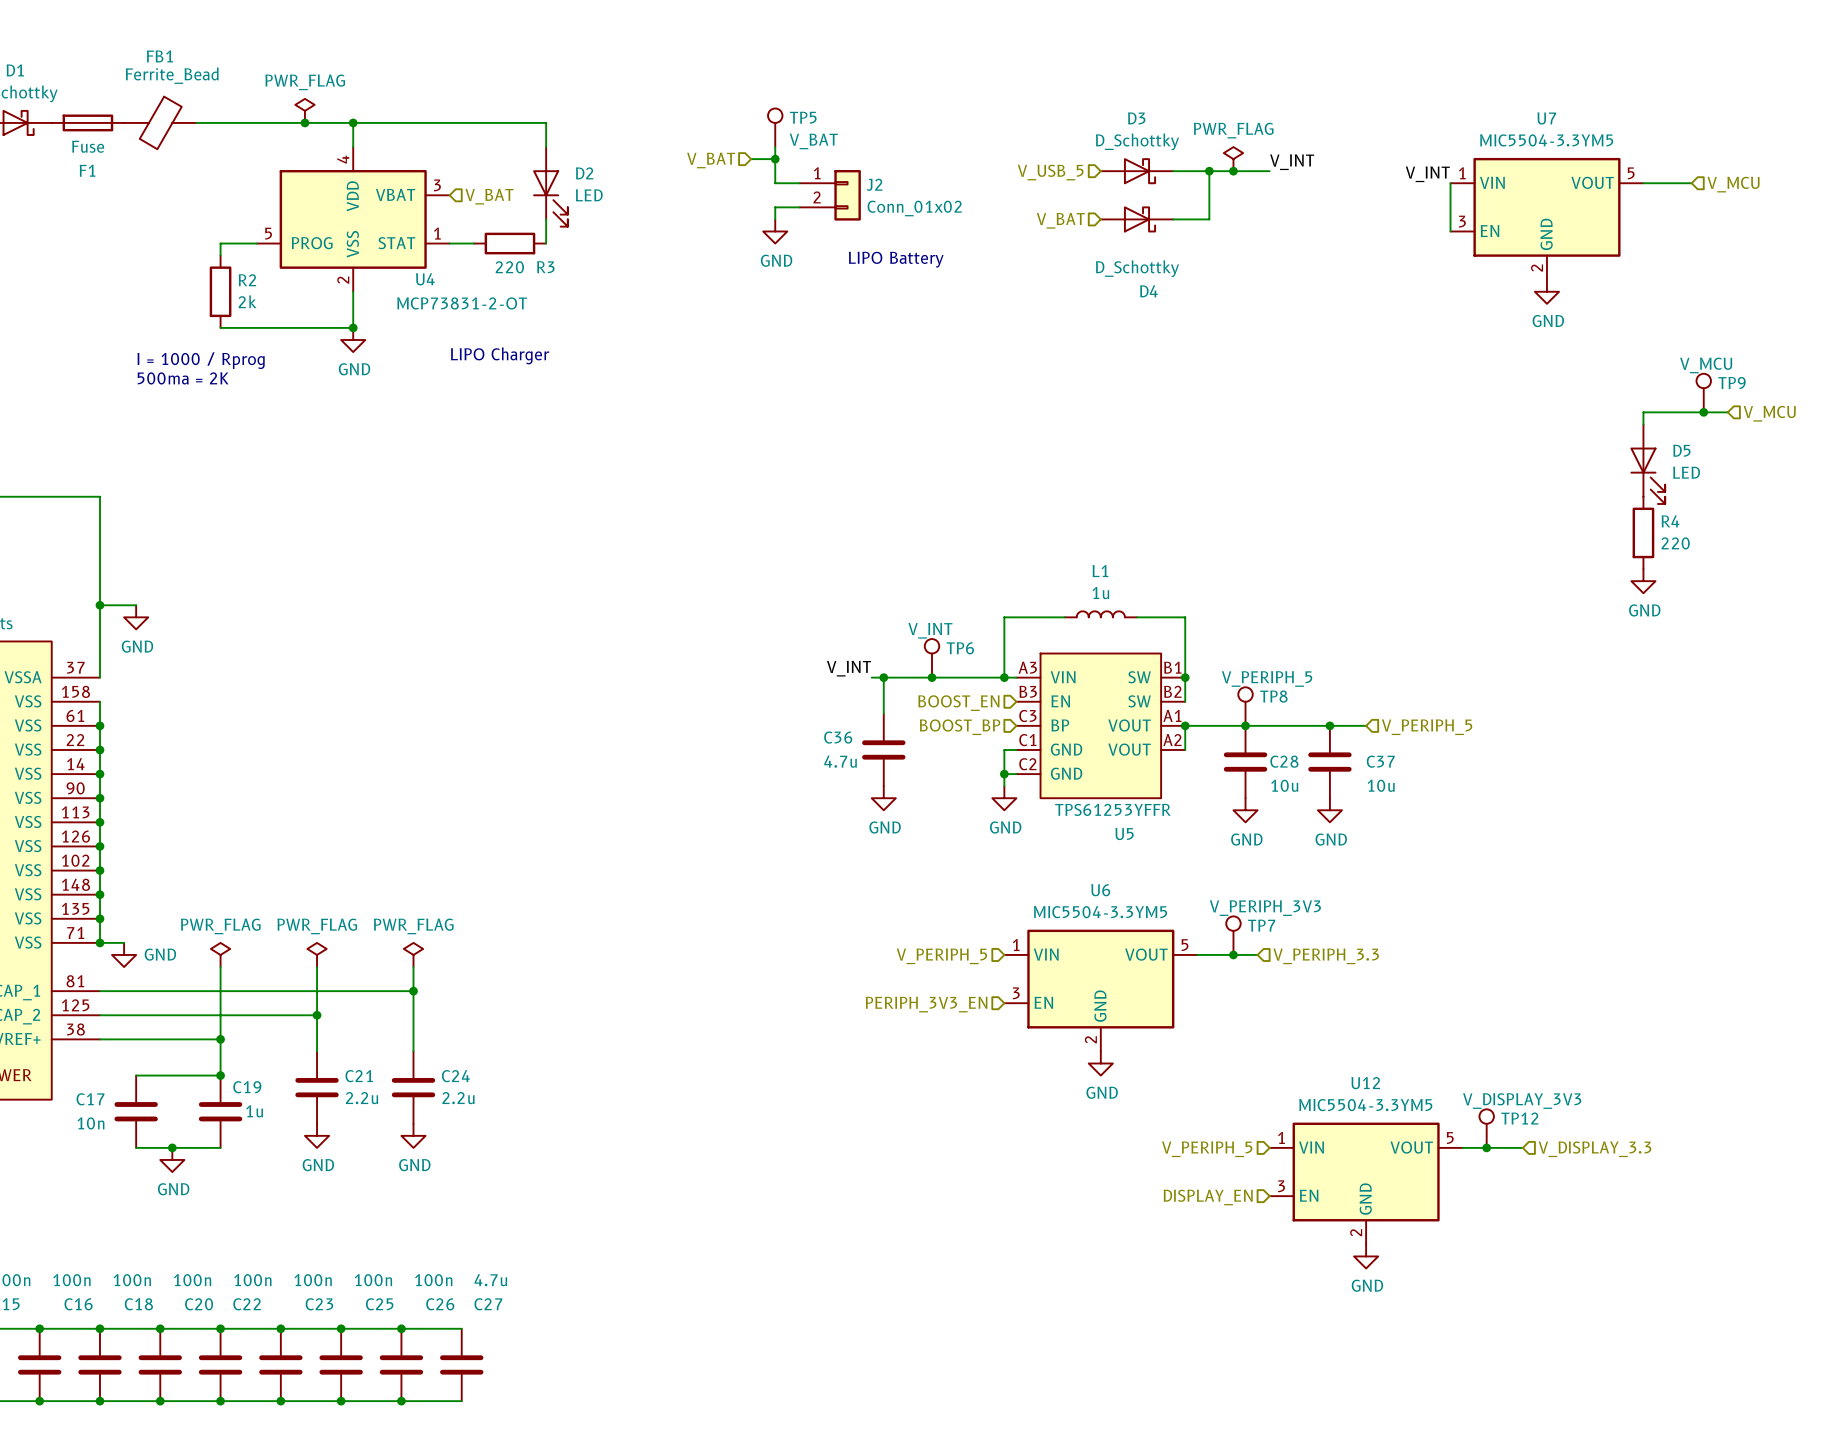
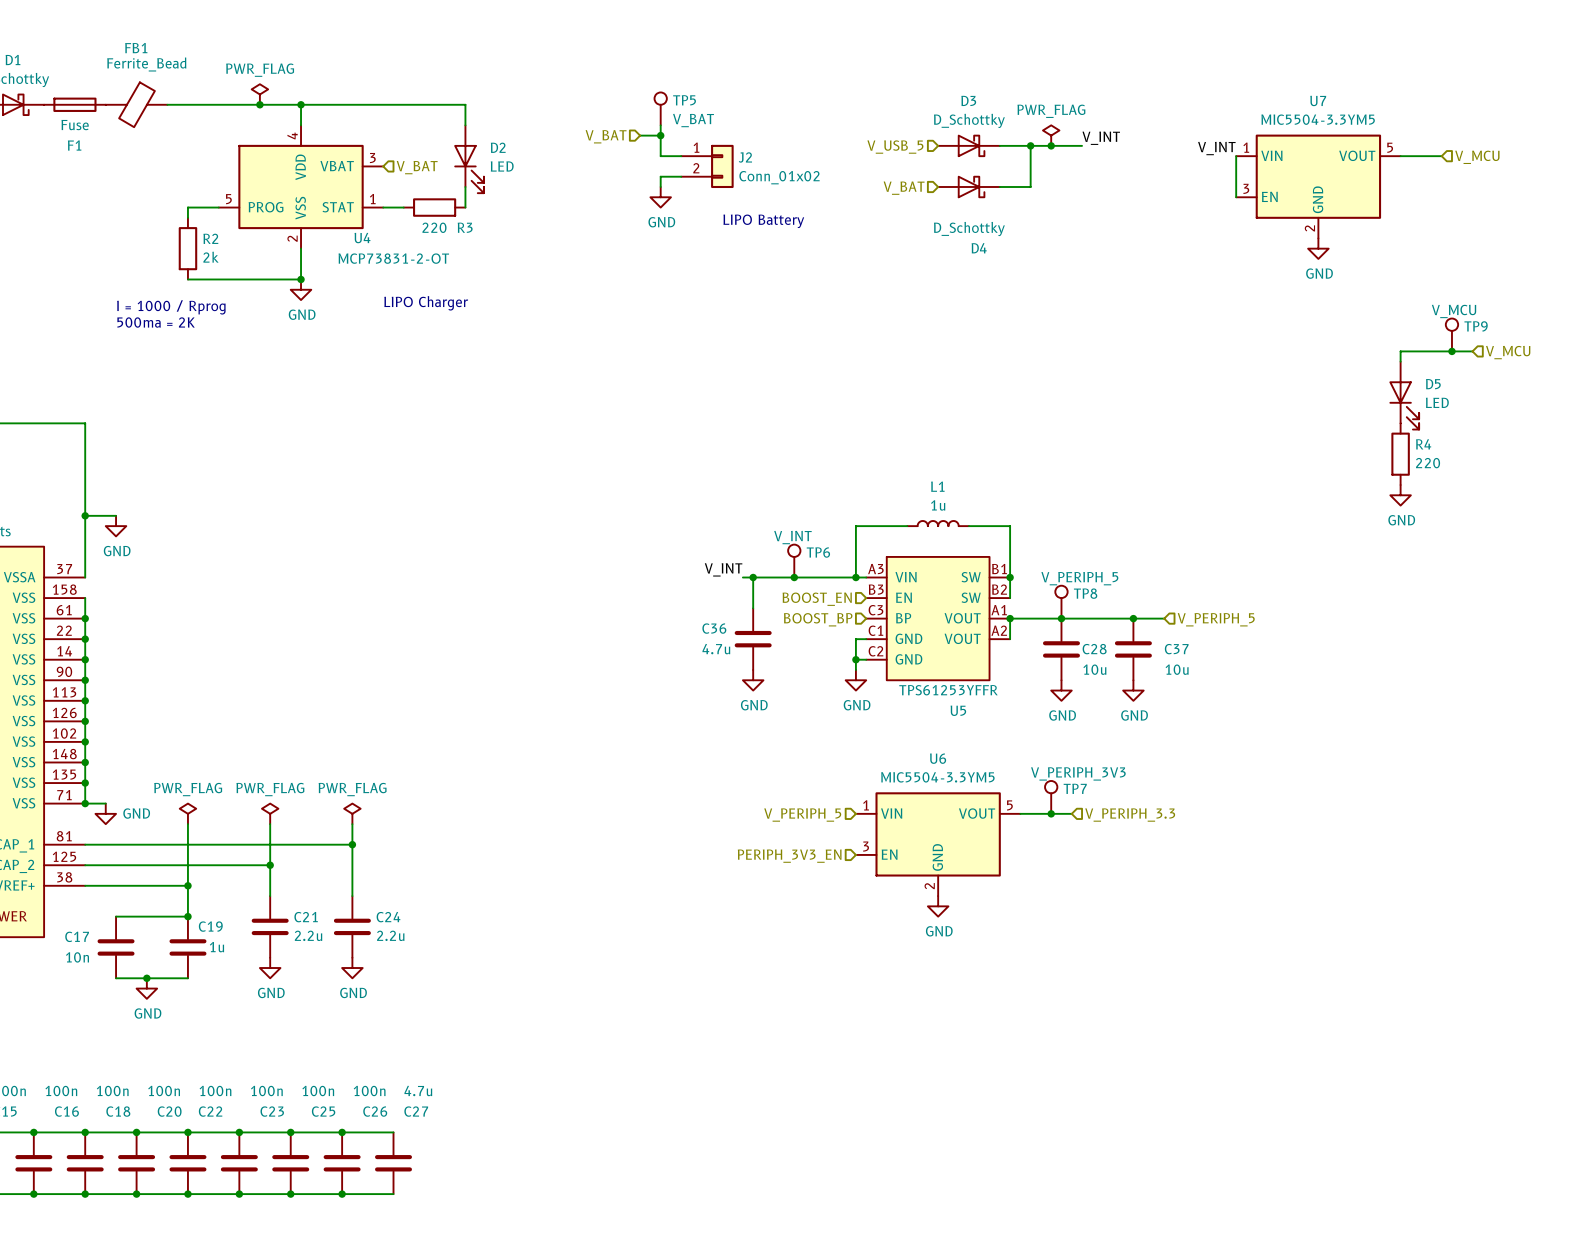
TP12: V_DISPLAY_3V3 (1486, 1128) -> none
wire: (1462, 1147) (1522, 1147) -> none
junction: (1486, 1147) -> none
hierarchical label: V_PERIPH_5 (1207, 1149) -> none
hierarchical label: V_DISPLAY_3.3 (1595, 1149) -> none
U12: MIC5504-3.3YM5 (1366, 1183) -> none
hierarchical label: DISPLAY_EN (1208, 1197) -> none
power symbol: GND (1366, 1256) -> none

